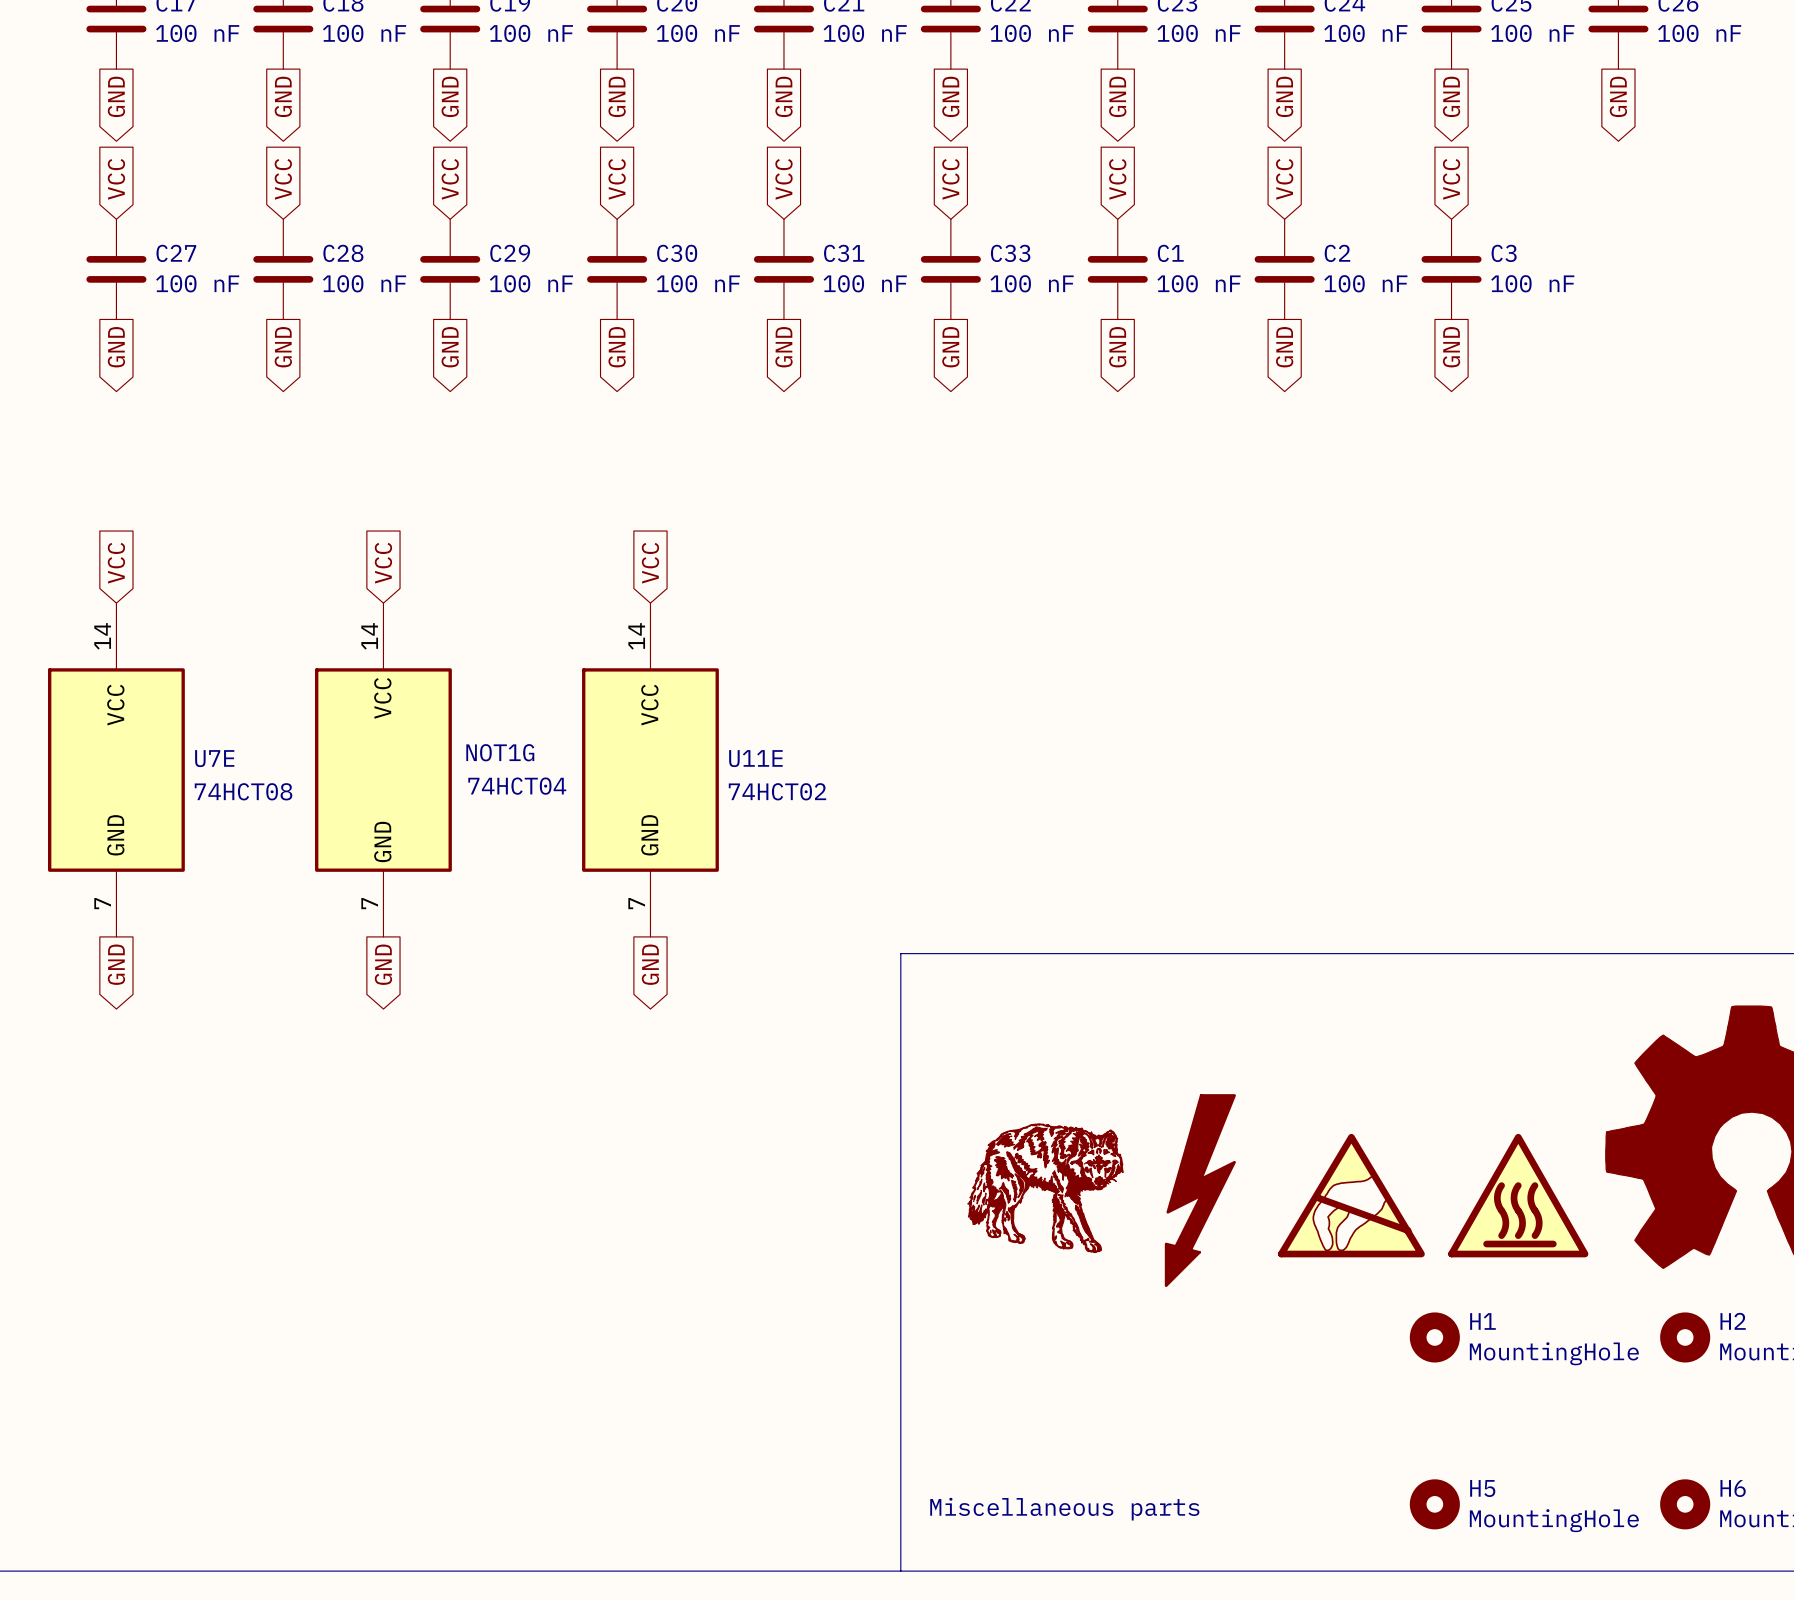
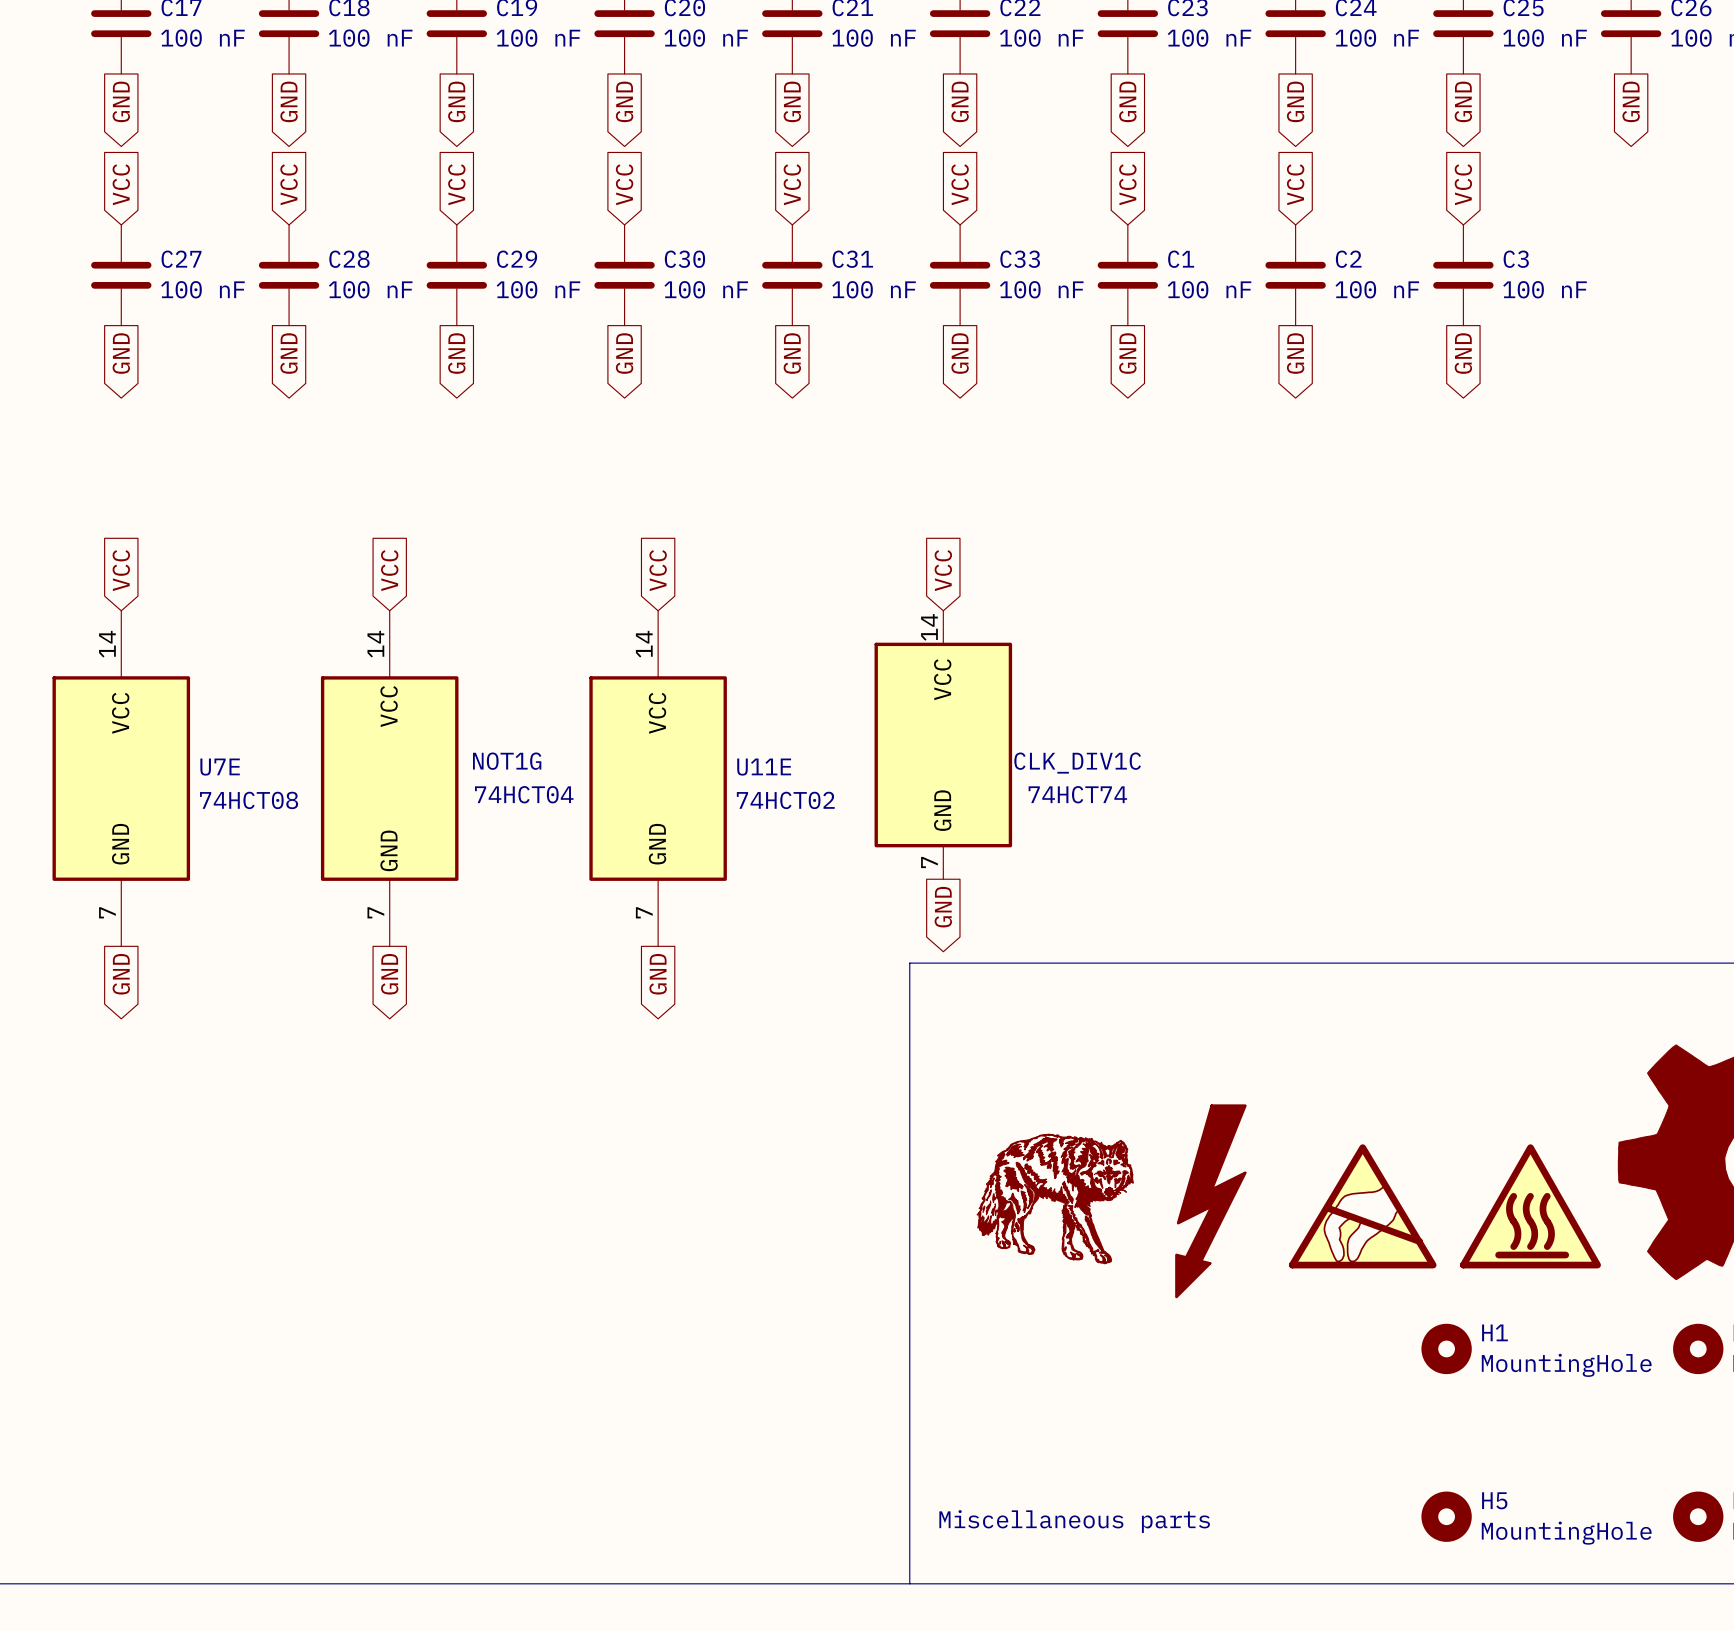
global label: none -> VCC (943, 570)
CLK_DIV1C: none -> 74HCT74 (943, 745)
global label: none -> GND (943, 907)

